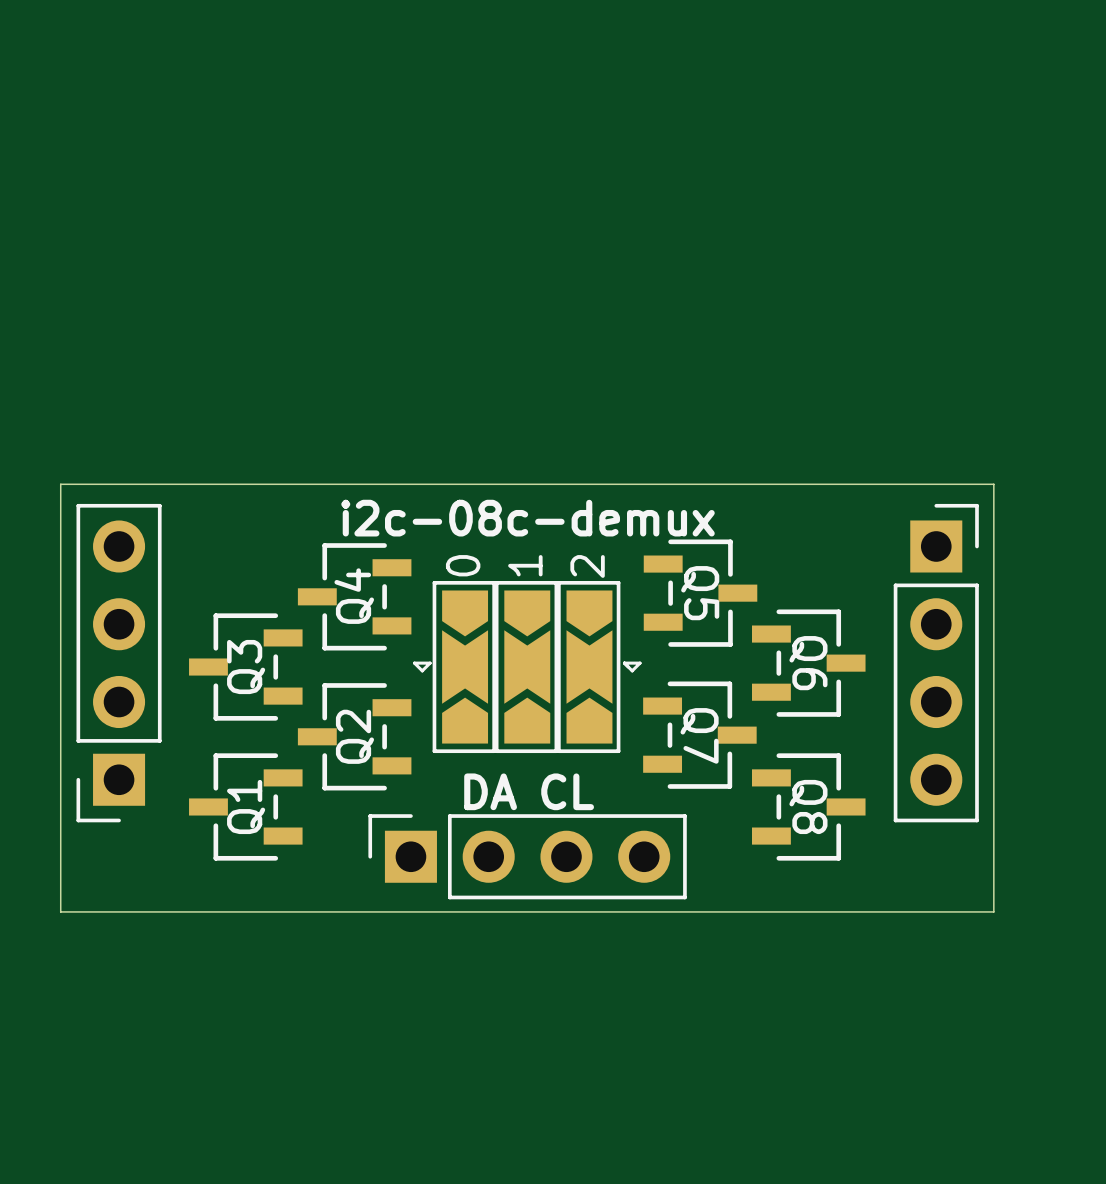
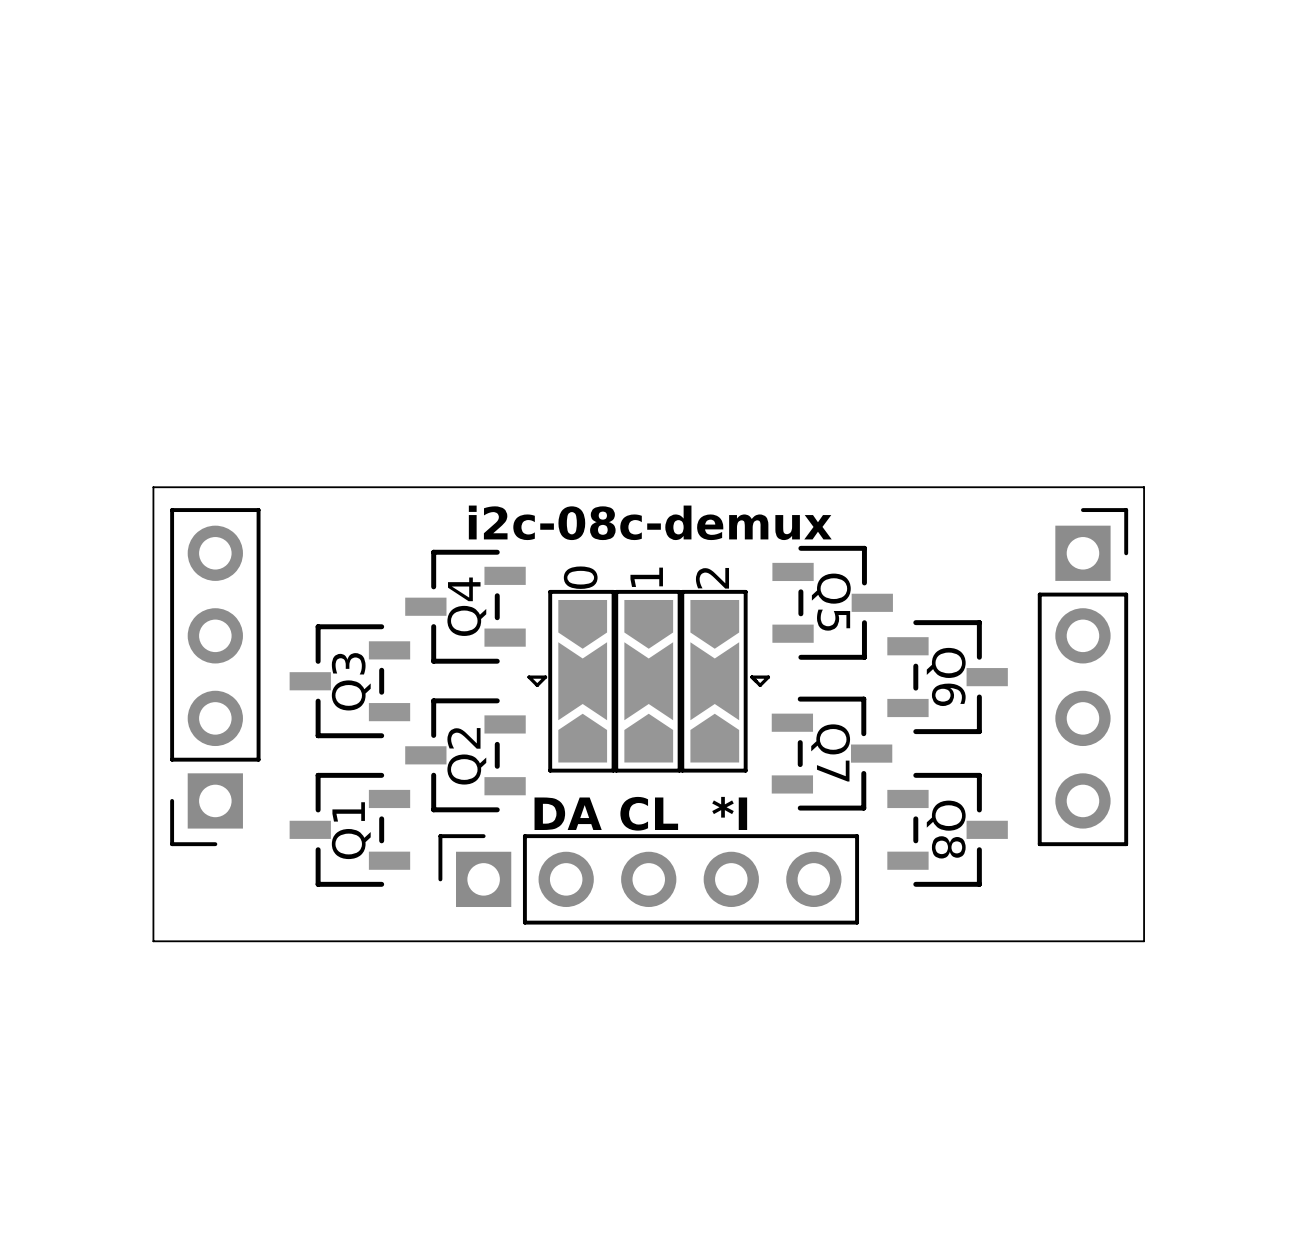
text position: DA (490, 791) -> DA (568, 813)
text position: CL (567, 791) -> CL (649, 813)
text: none -> *I (729, 813)
part footprint: [368, 814, 687, 900] -> [438, 834, 860, 925]

